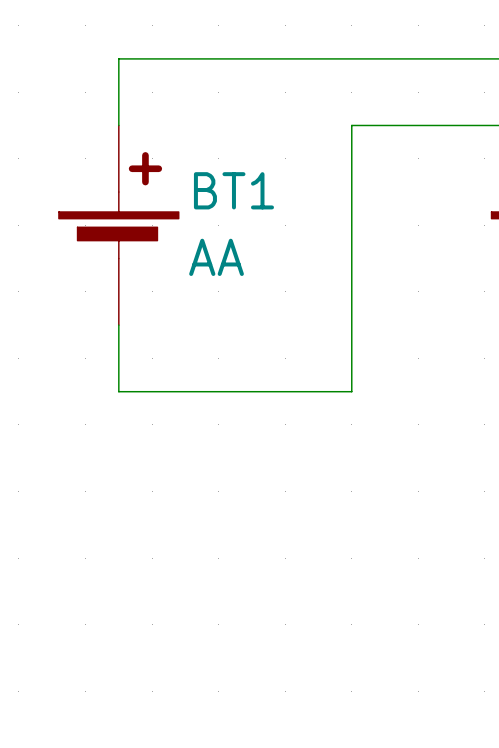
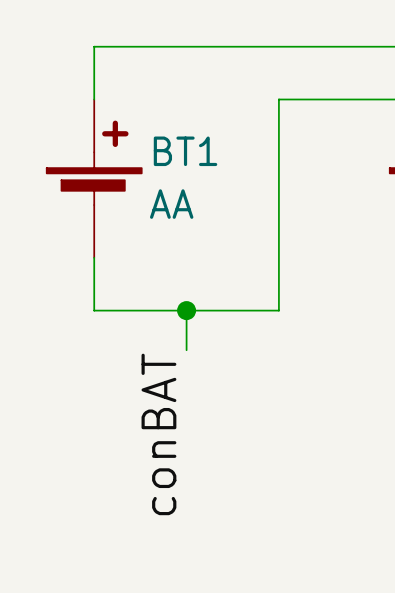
wire: none -> (186, 310) (186, 350)
junction: none -> (186, 310)
label: none -> conBAT (158, 434)

